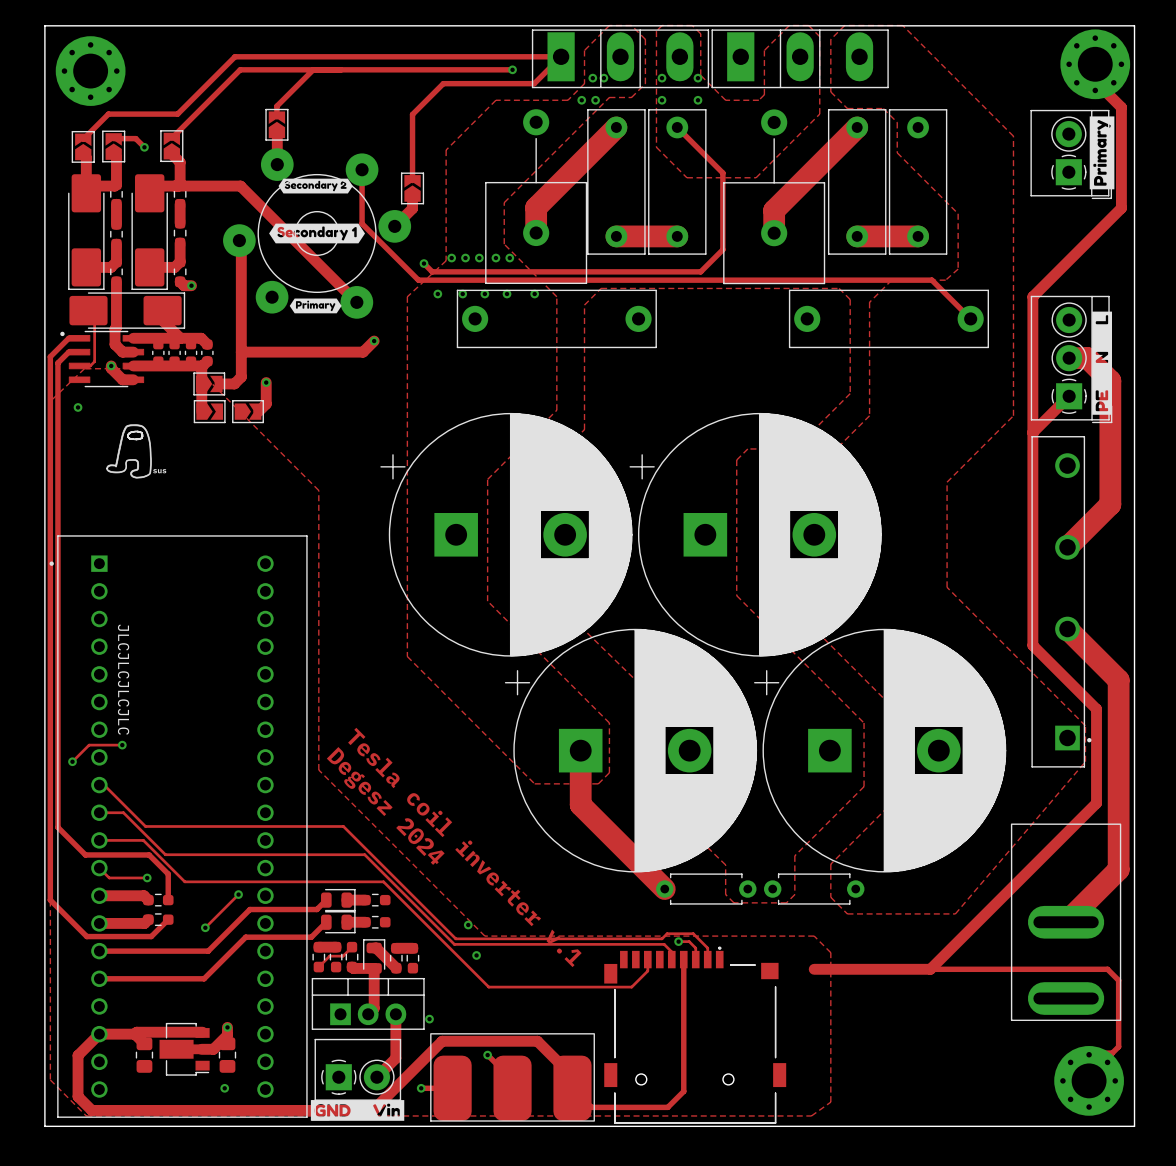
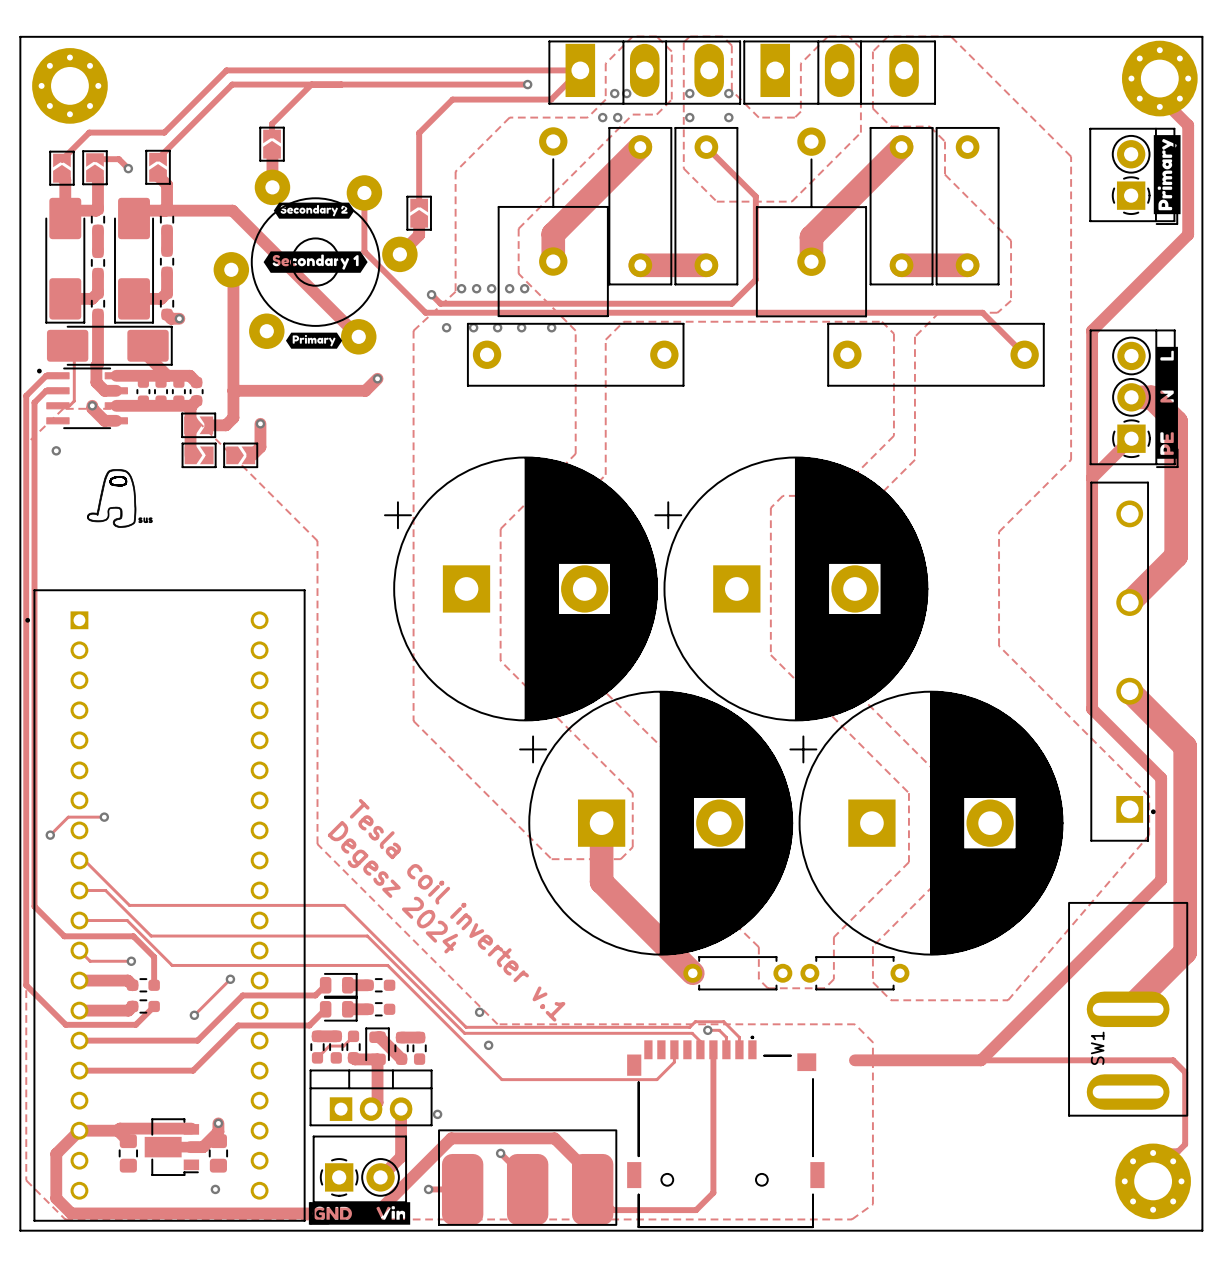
text: JLCJLCJLCJLC (123, 679) -> none
SW1 name: none -> SW1 (1097, 1048)

